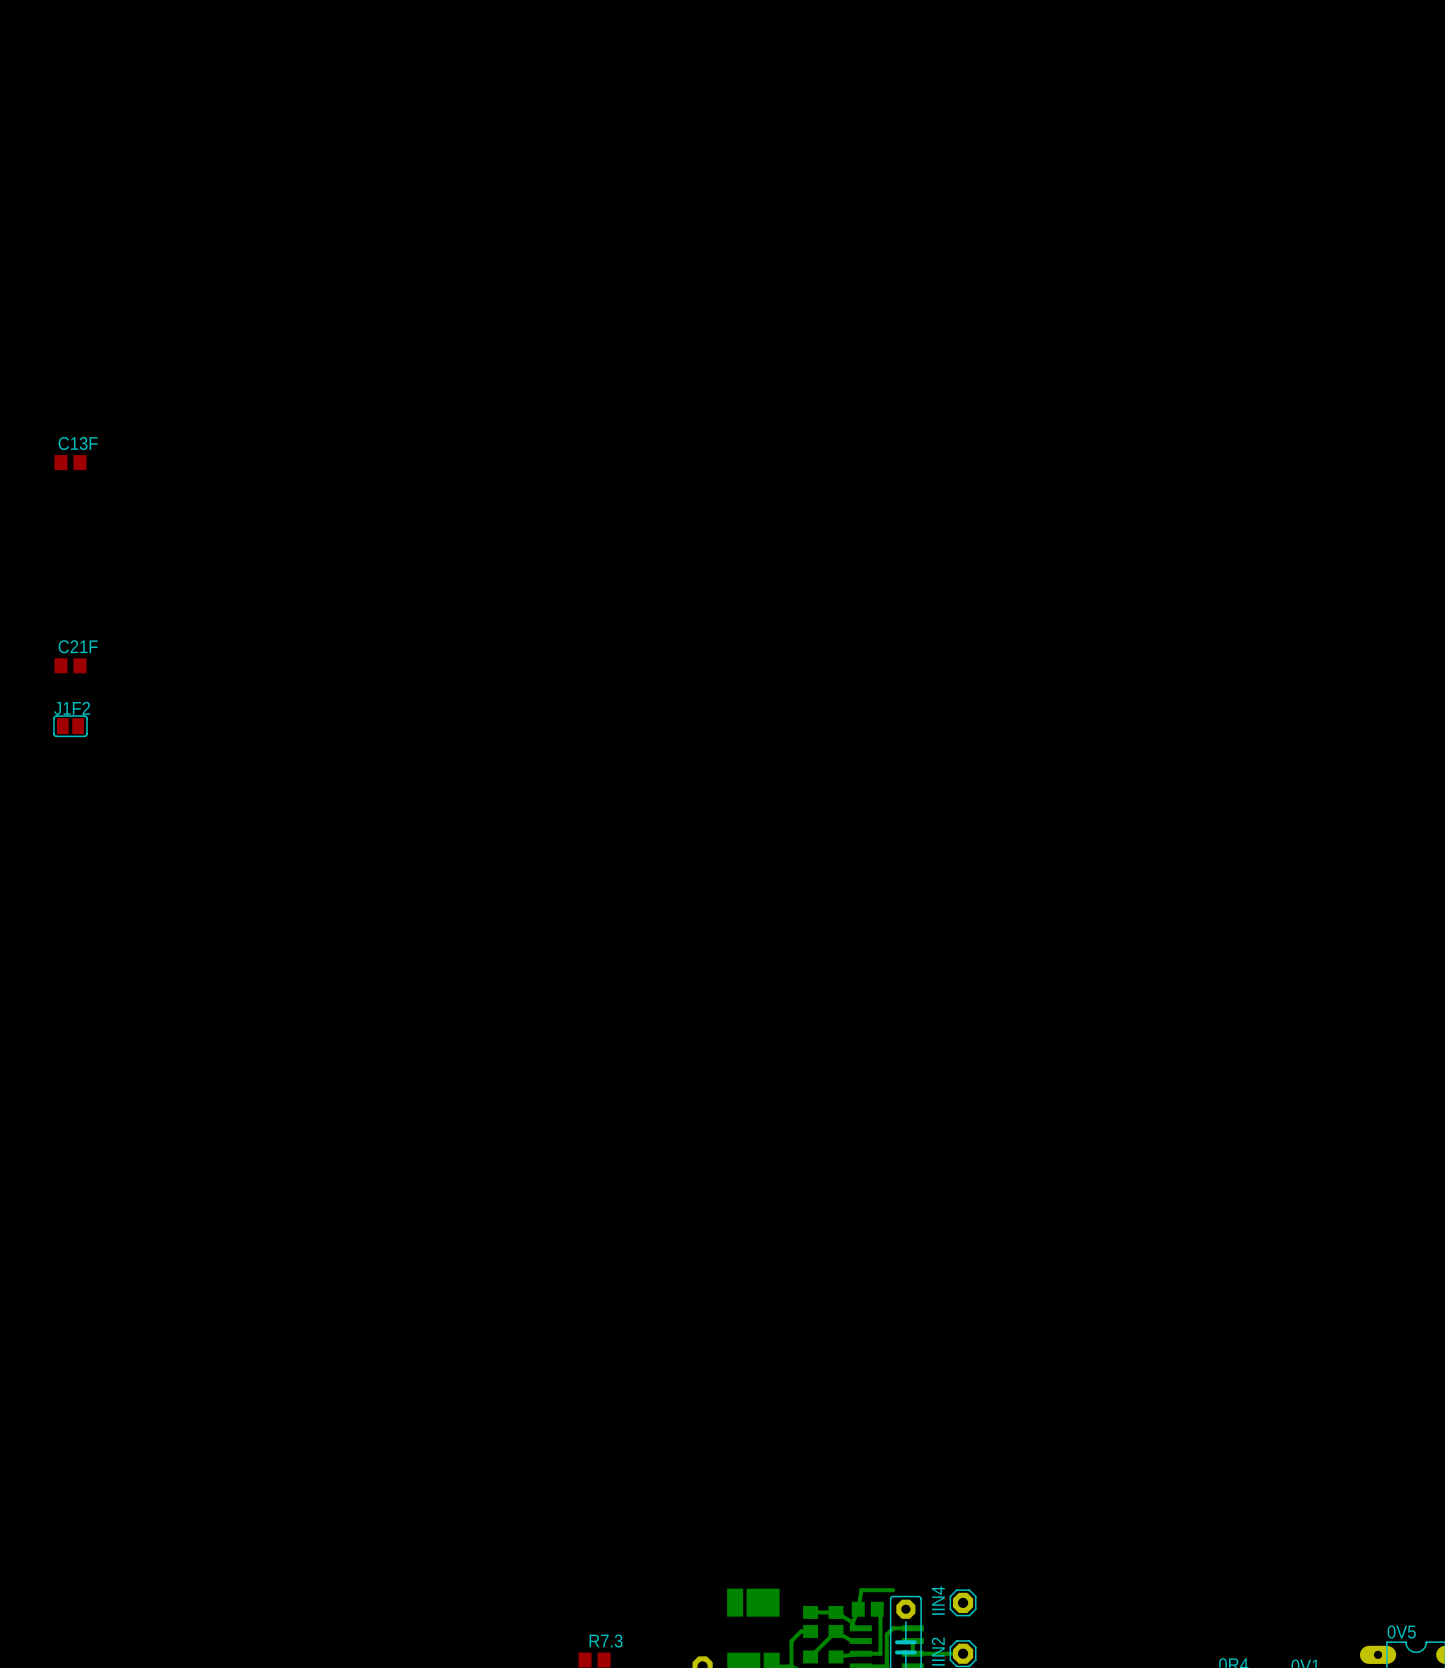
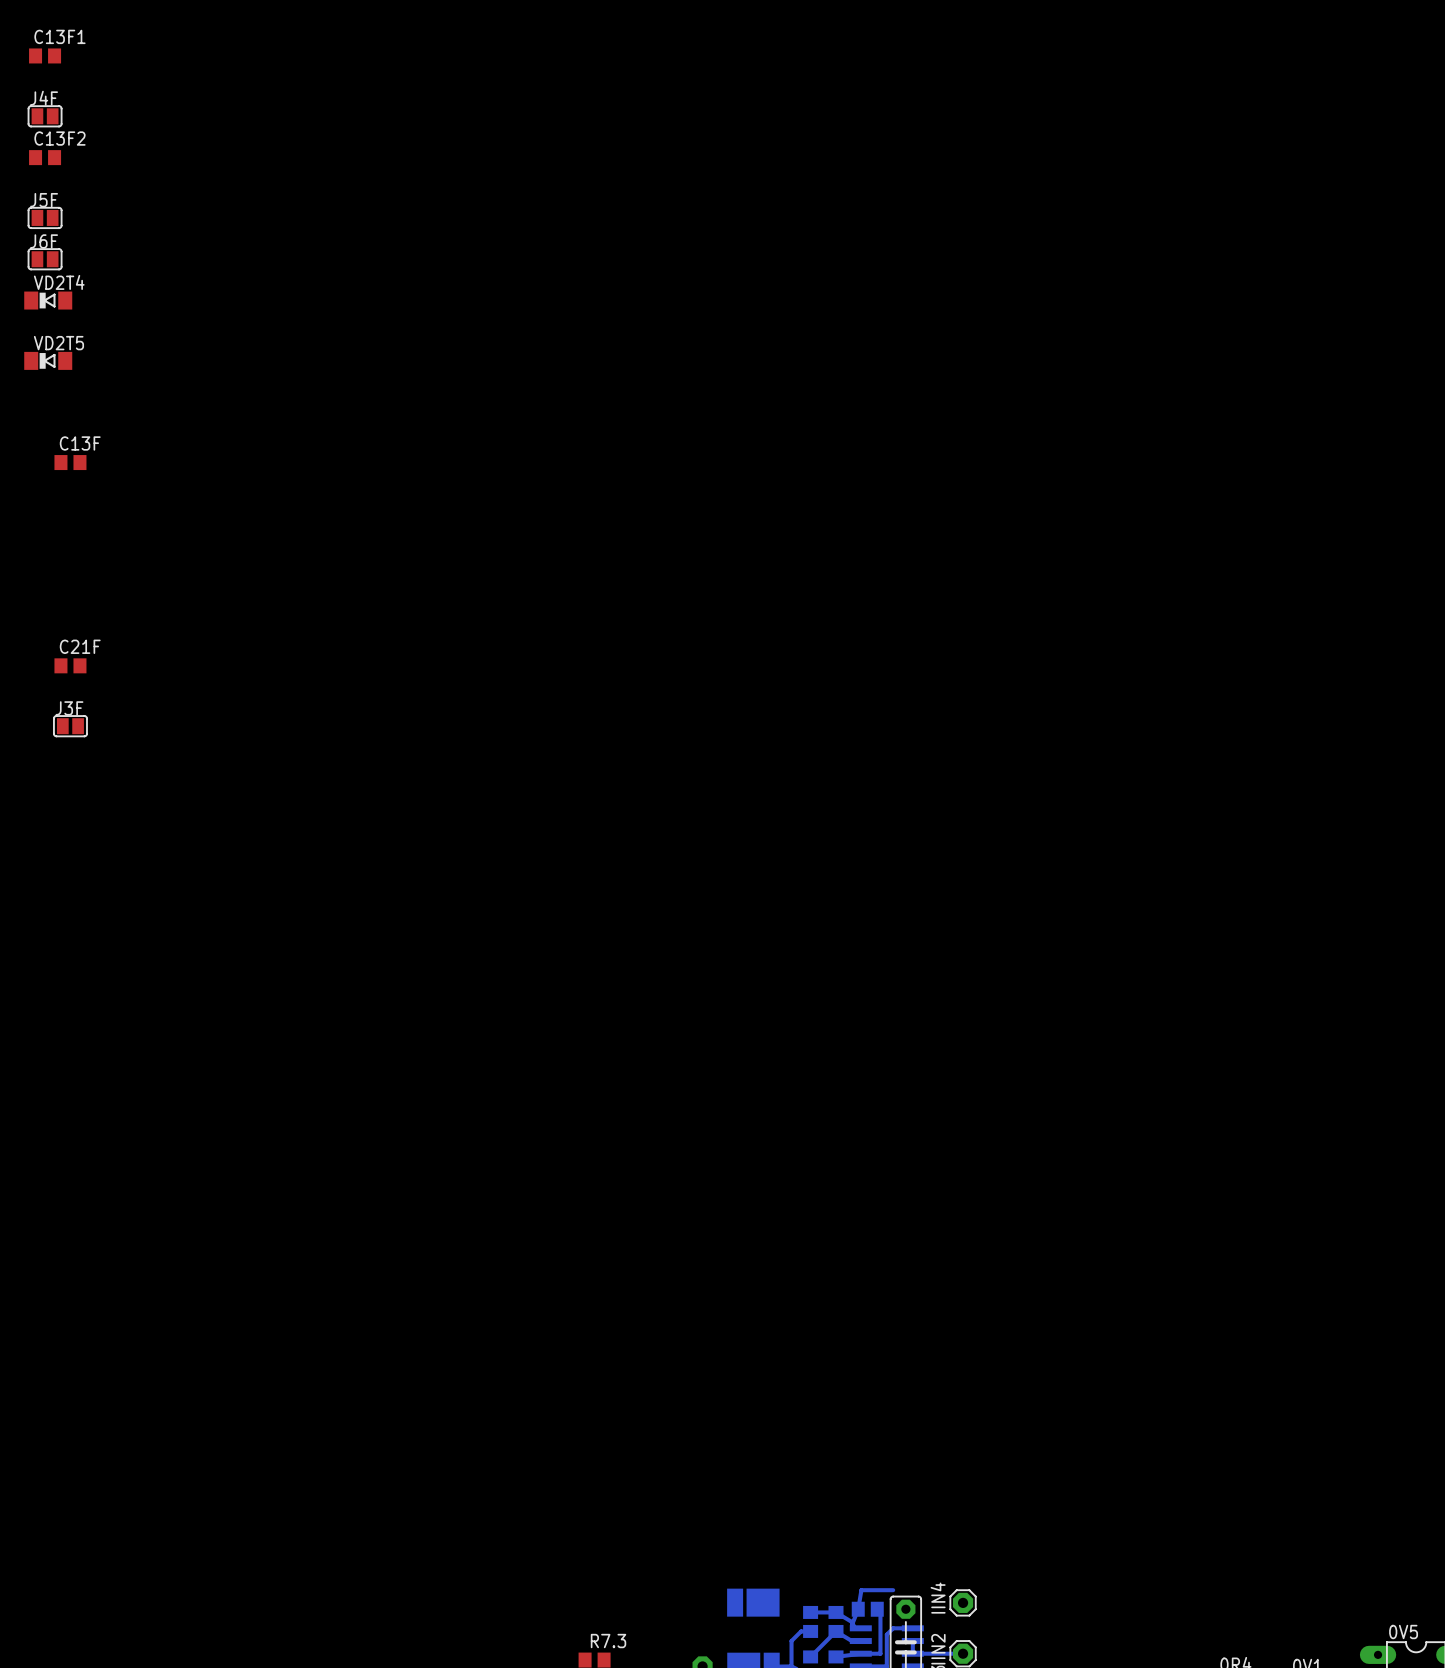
C13F1: none -> (45, 55)
J4F: none -> (45, 116)
C13F2: none -> (45, 157)
J5F: none -> (45, 217)
J6F: none -> (45, 259)
VD2T4: none -> (48, 300)
VD2T5: none -> (48, 360)
J1F2 name: J1F2 (72, 708) -> J3F (69, 708)

